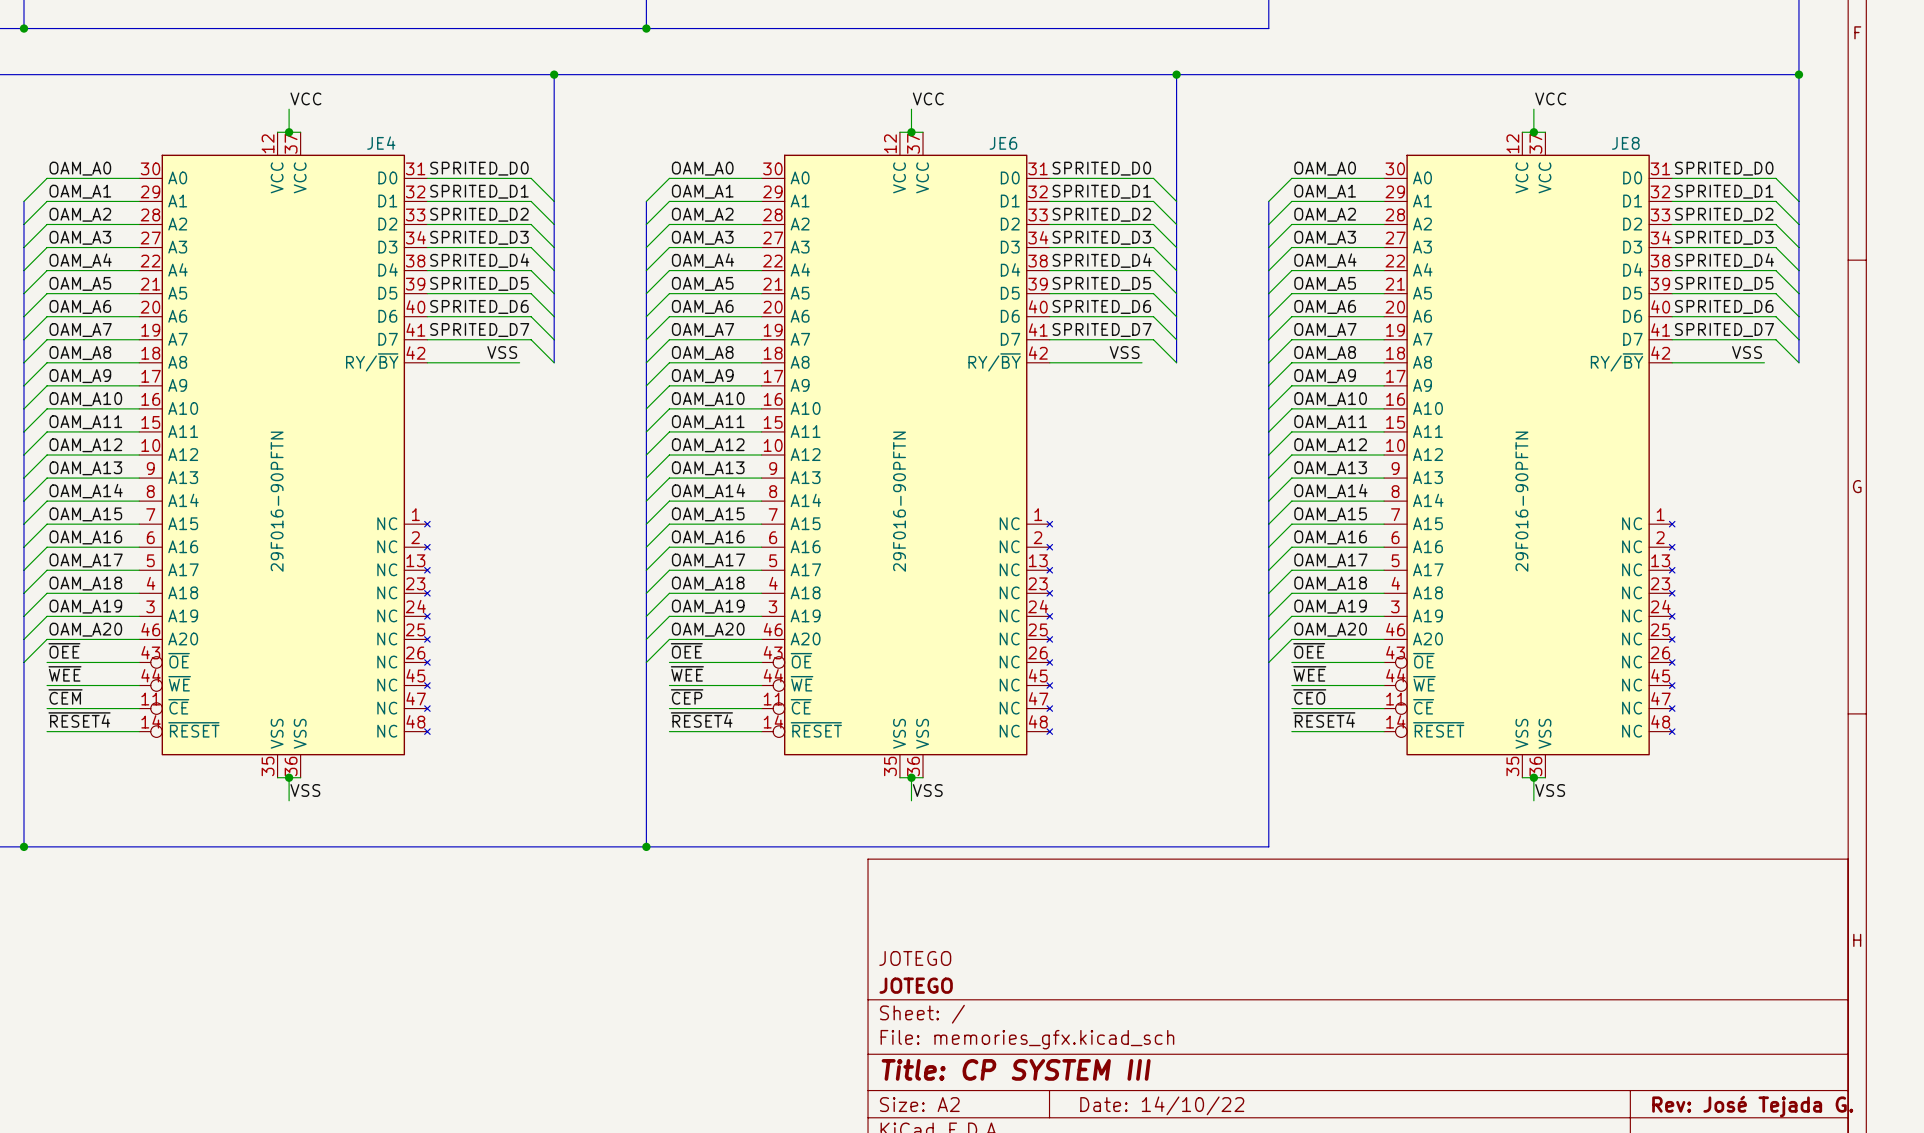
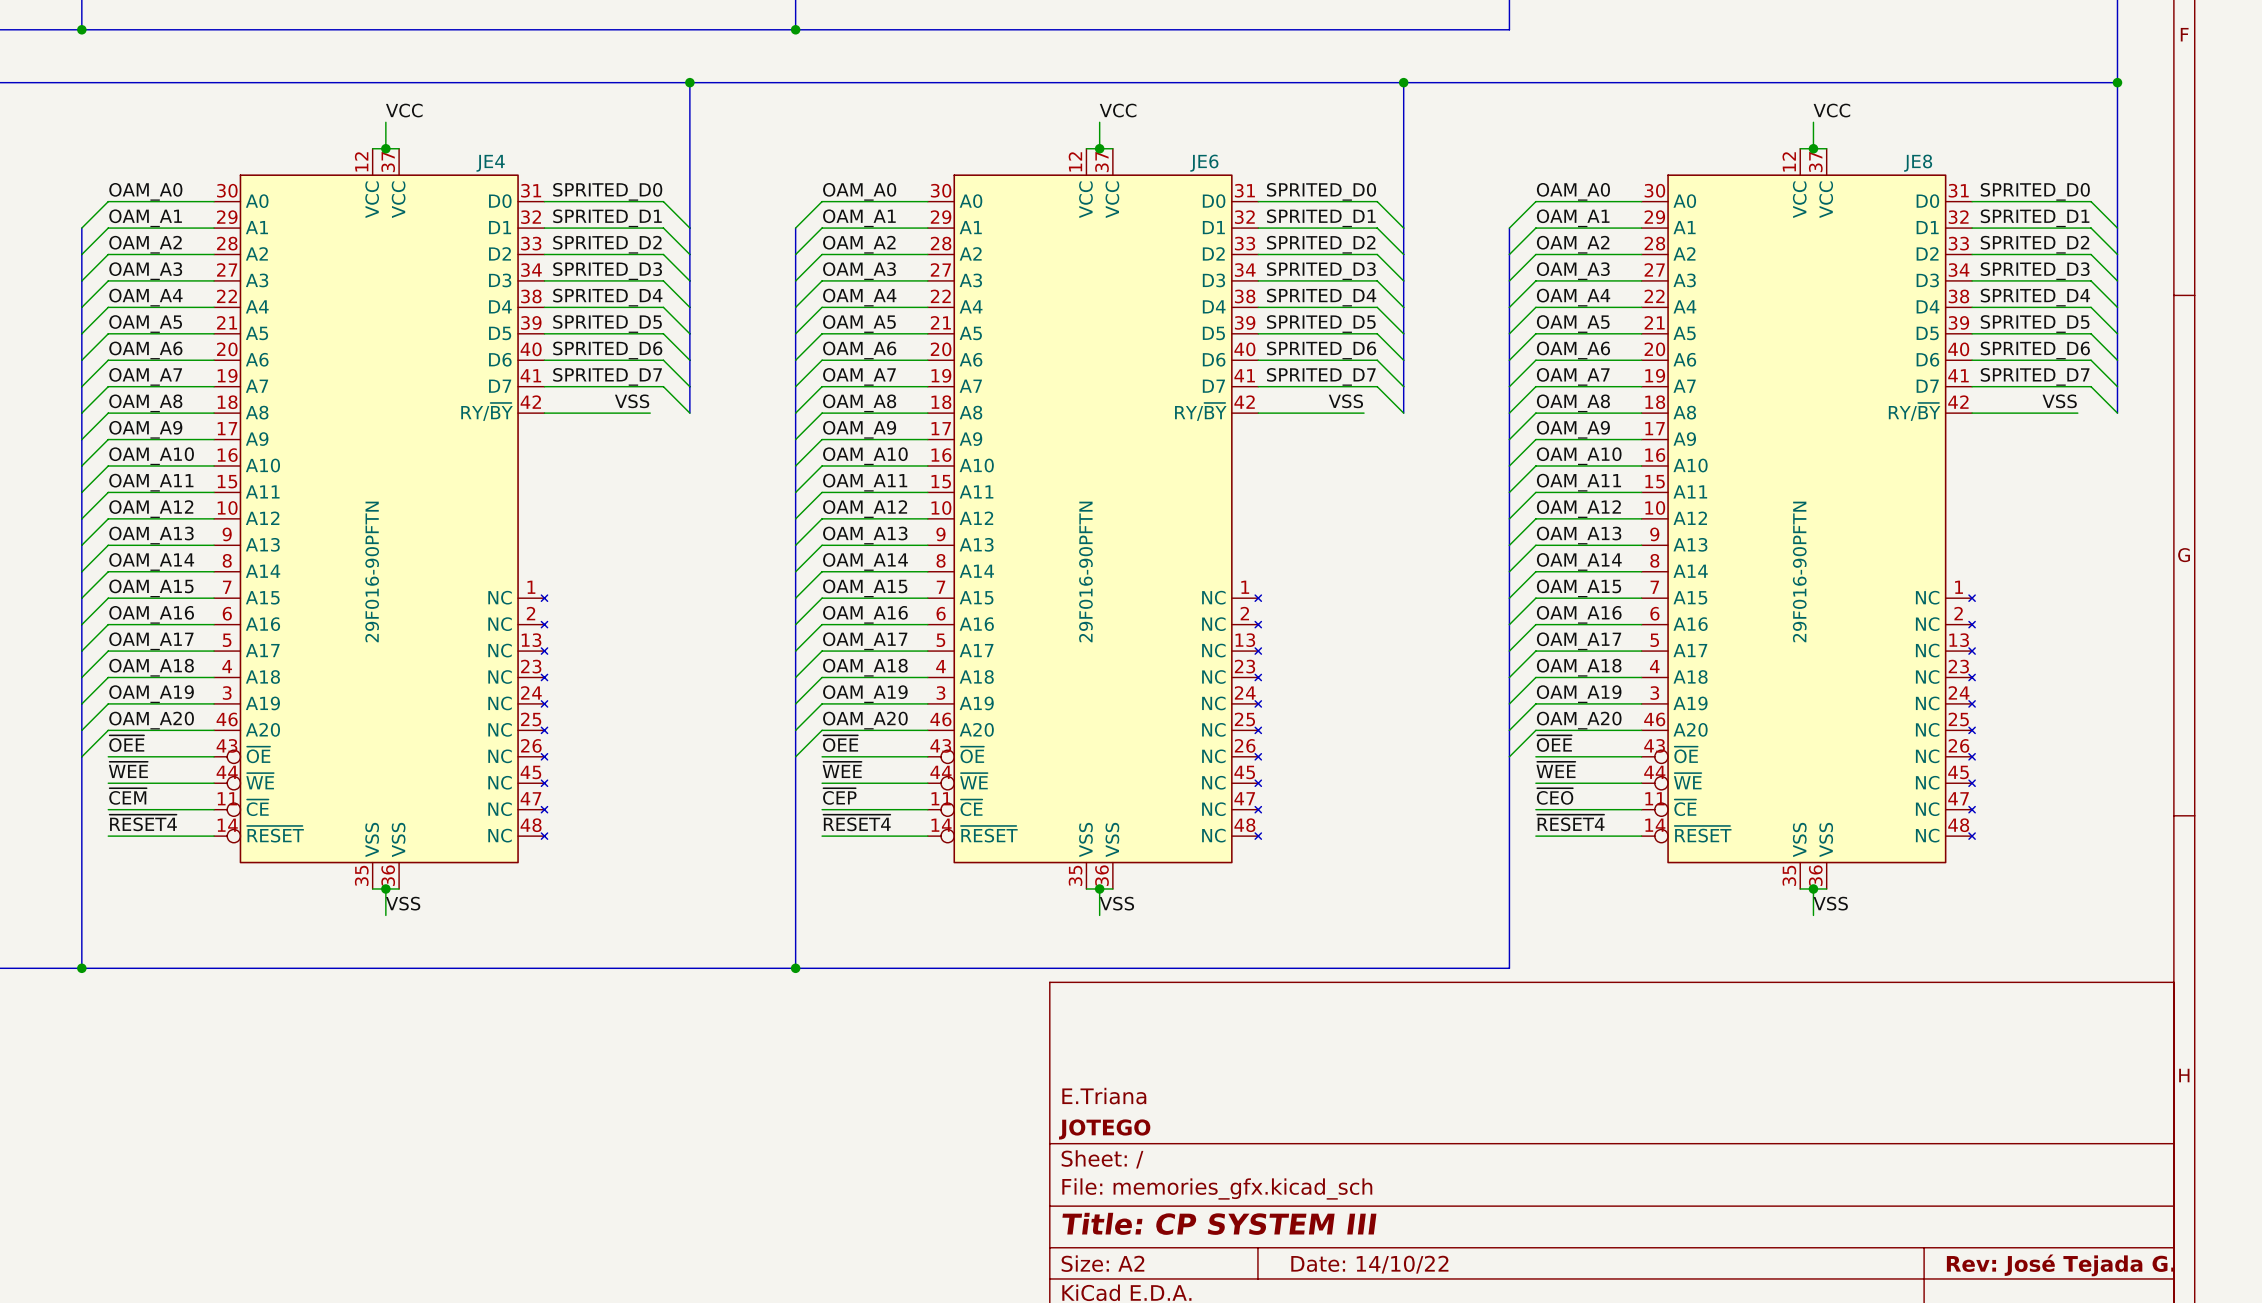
title block: JOTEGO (915, 958) -> E.Triana (1104, 1096)

